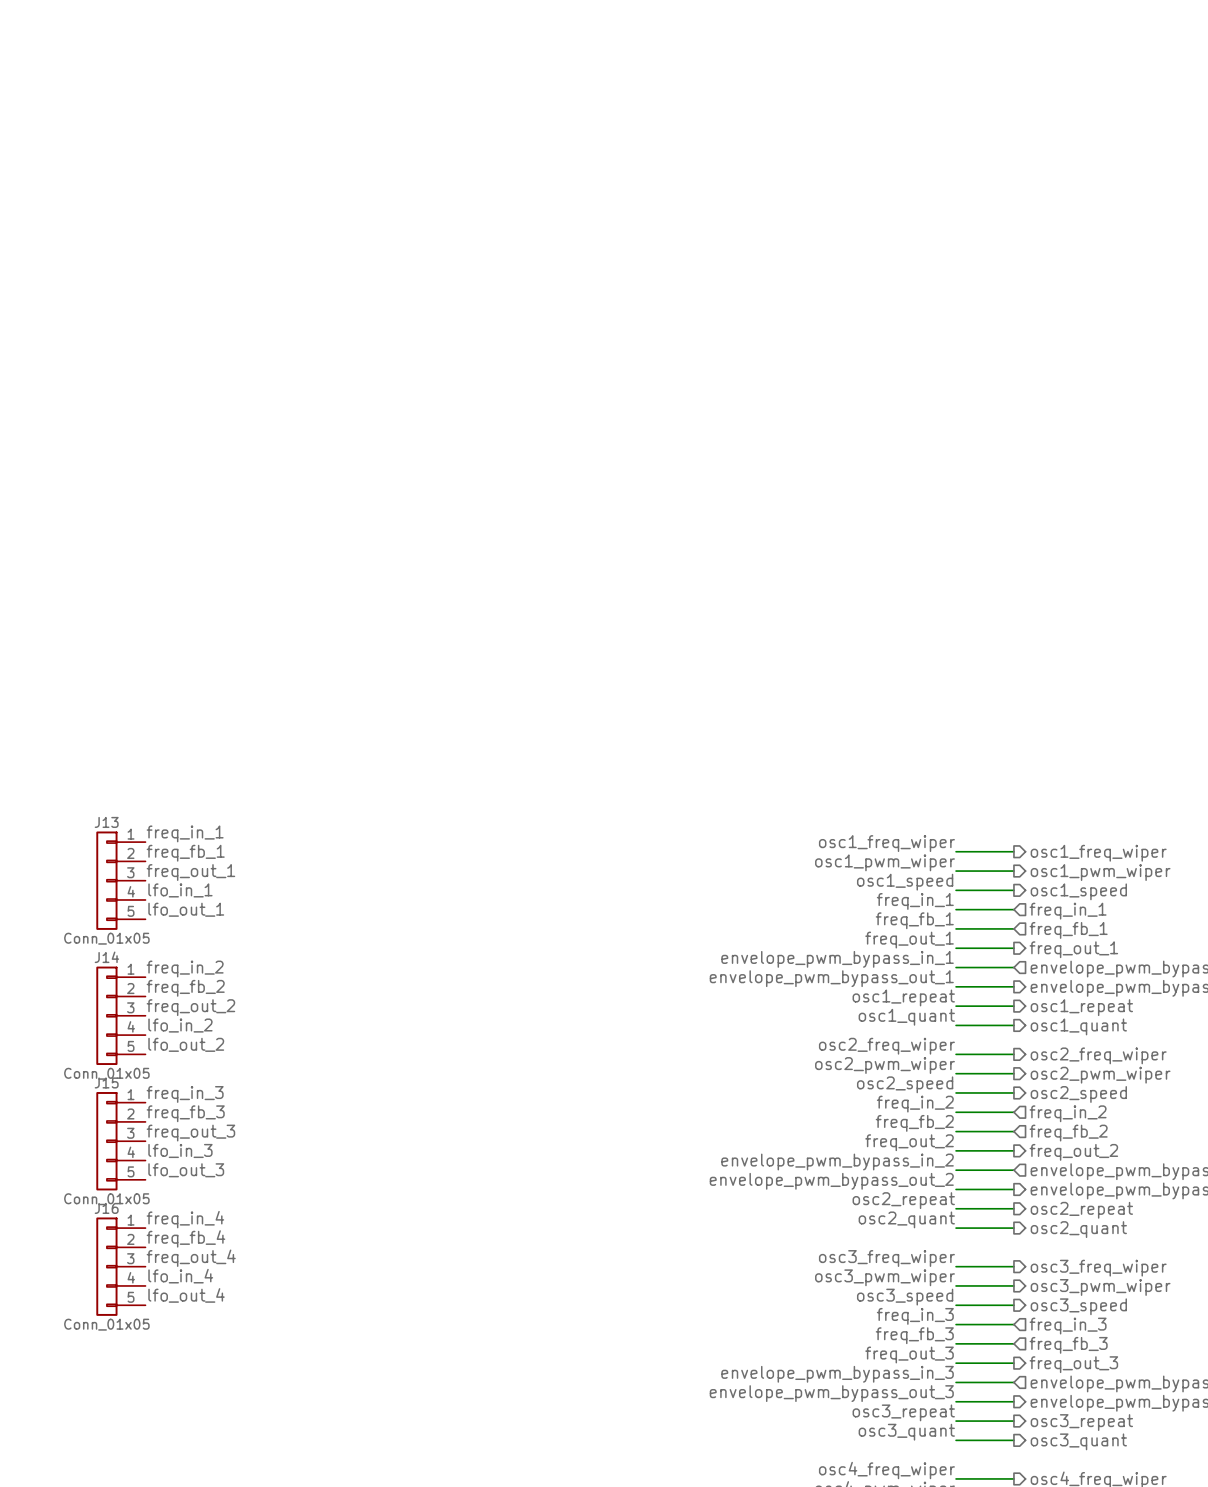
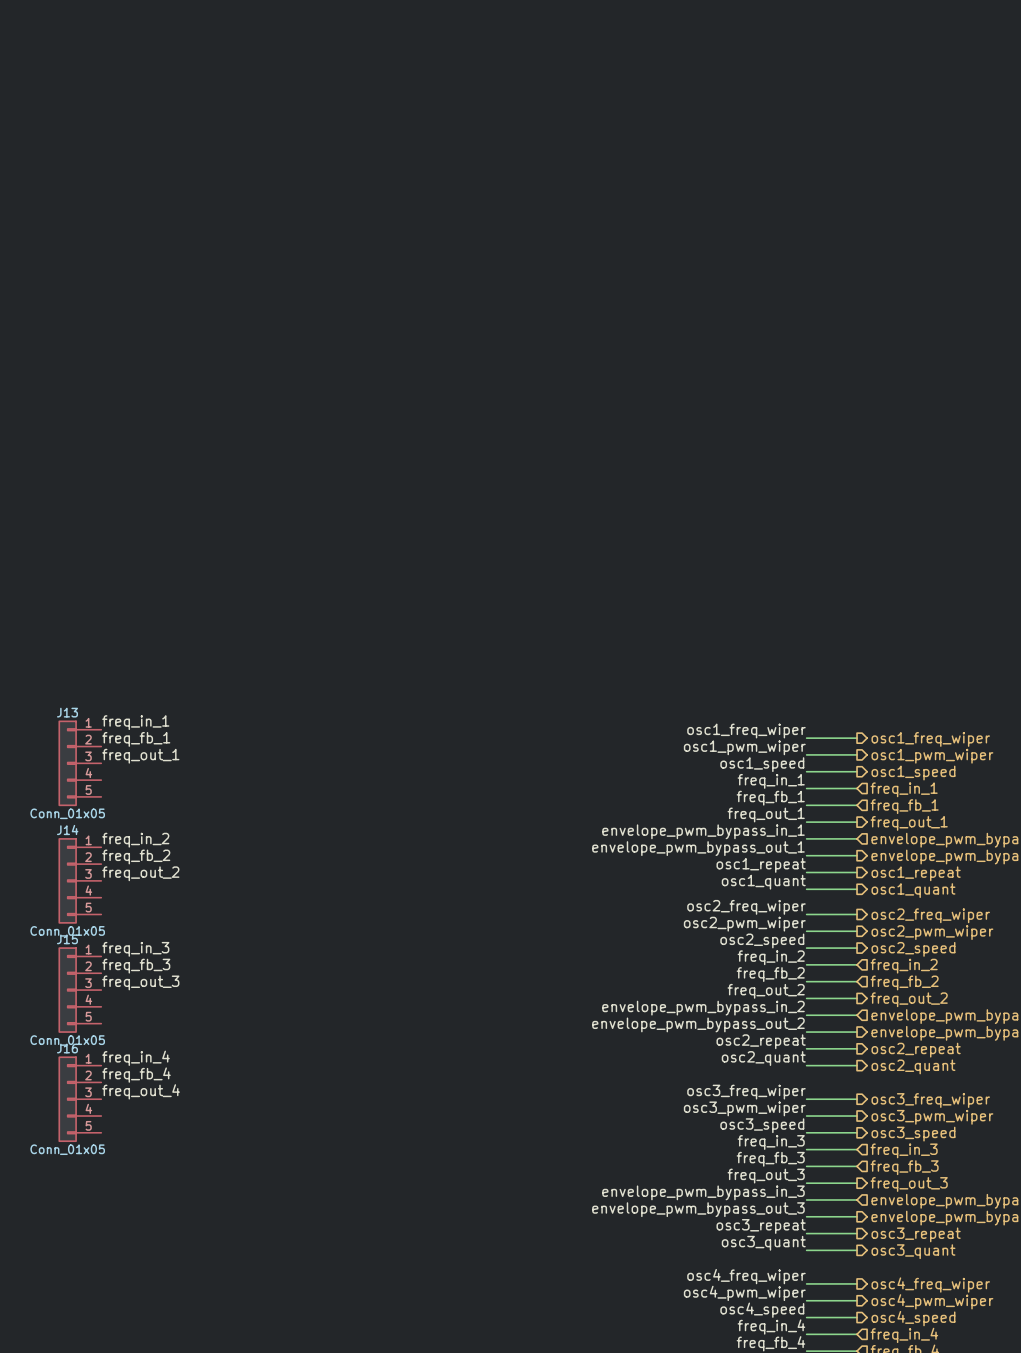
label: lfo_in_1 (180, 890) -> none
label: lfo_out_1 (186, 909) -> none
label: lfo_in_2 (180, 1025) -> none
label: lfo_out_2 (186, 1044) -> none
label: lfo_in_3 (180, 1150) -> none
label: lfo_out_3 (186, 1170) -> none
label: lfo_in_4 (180, 1276) -> none
label: lfo_out_4 (186, 1295) -> none

